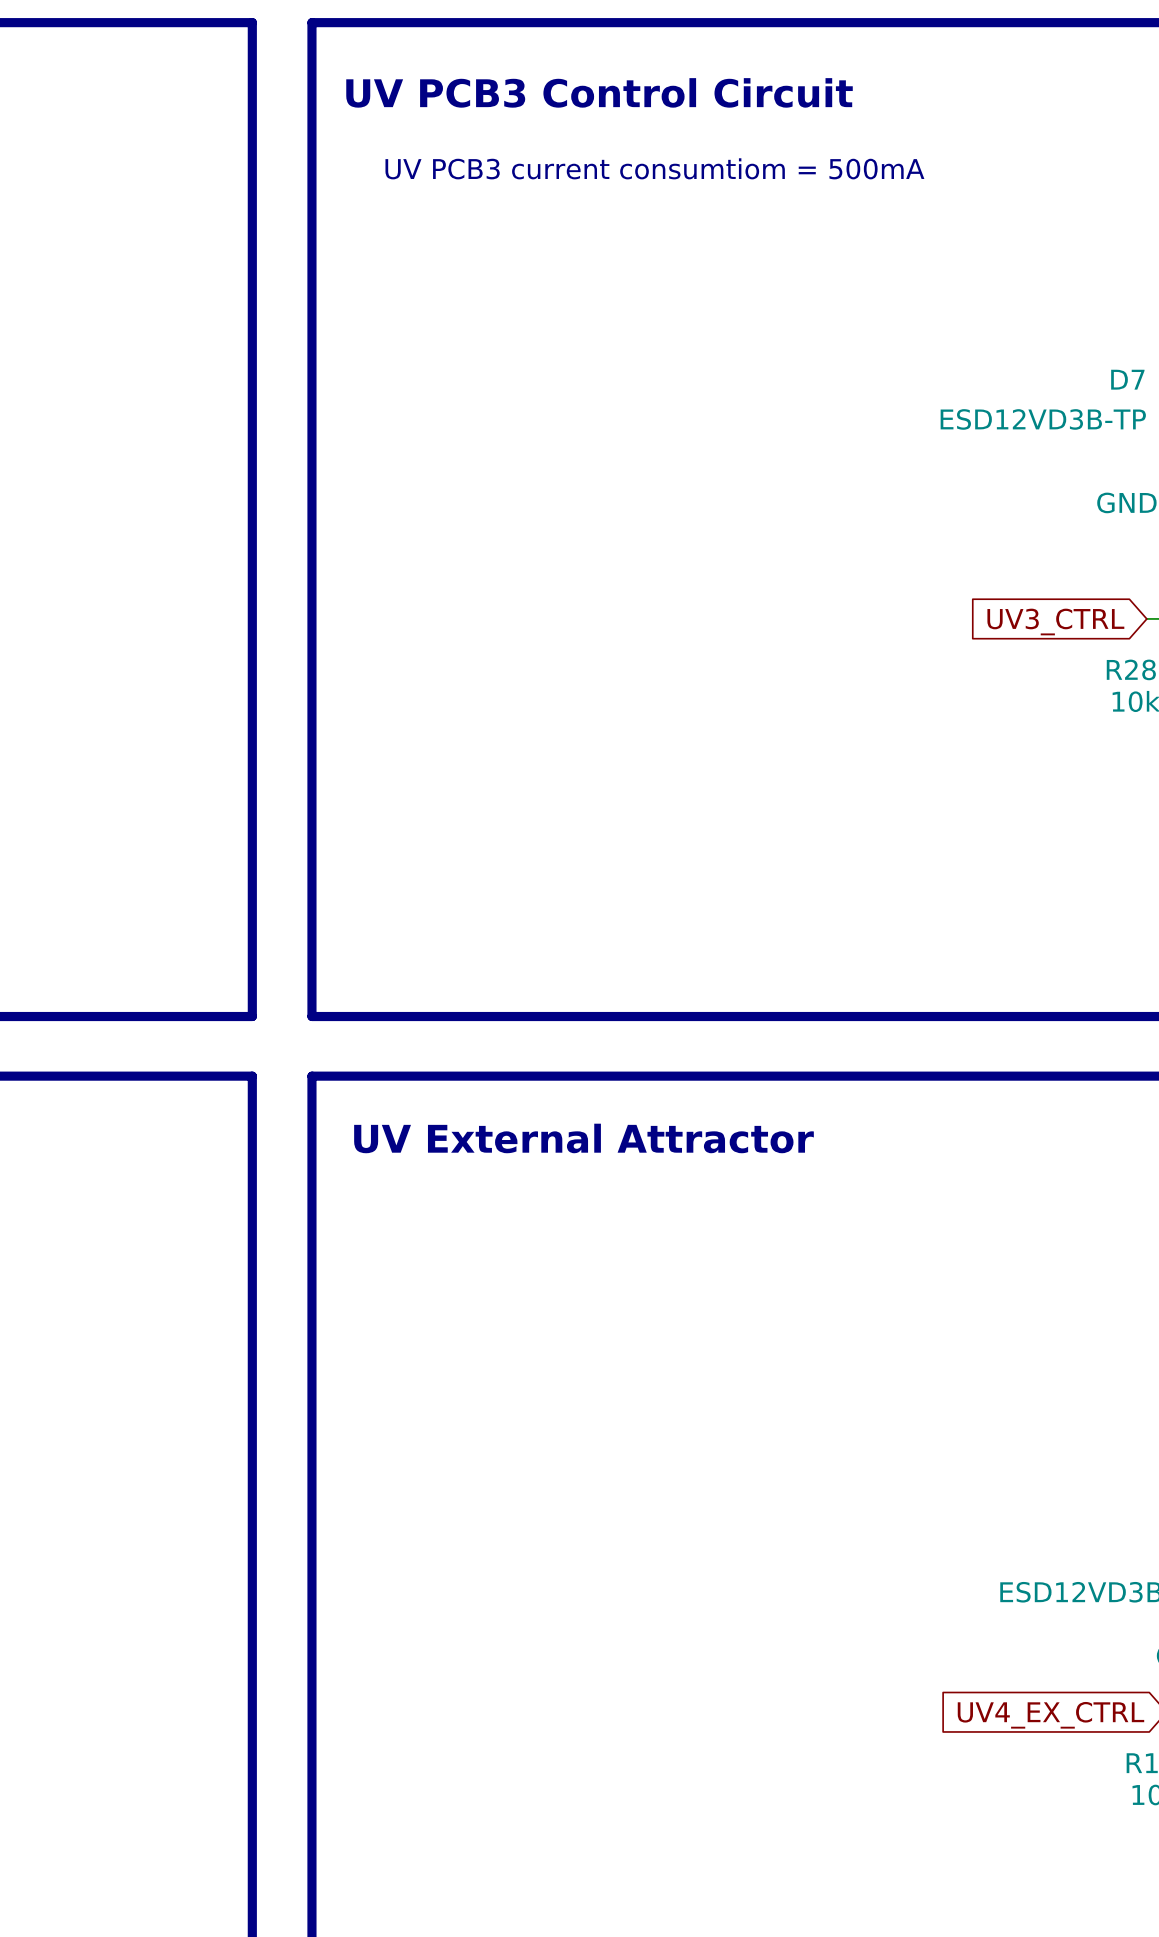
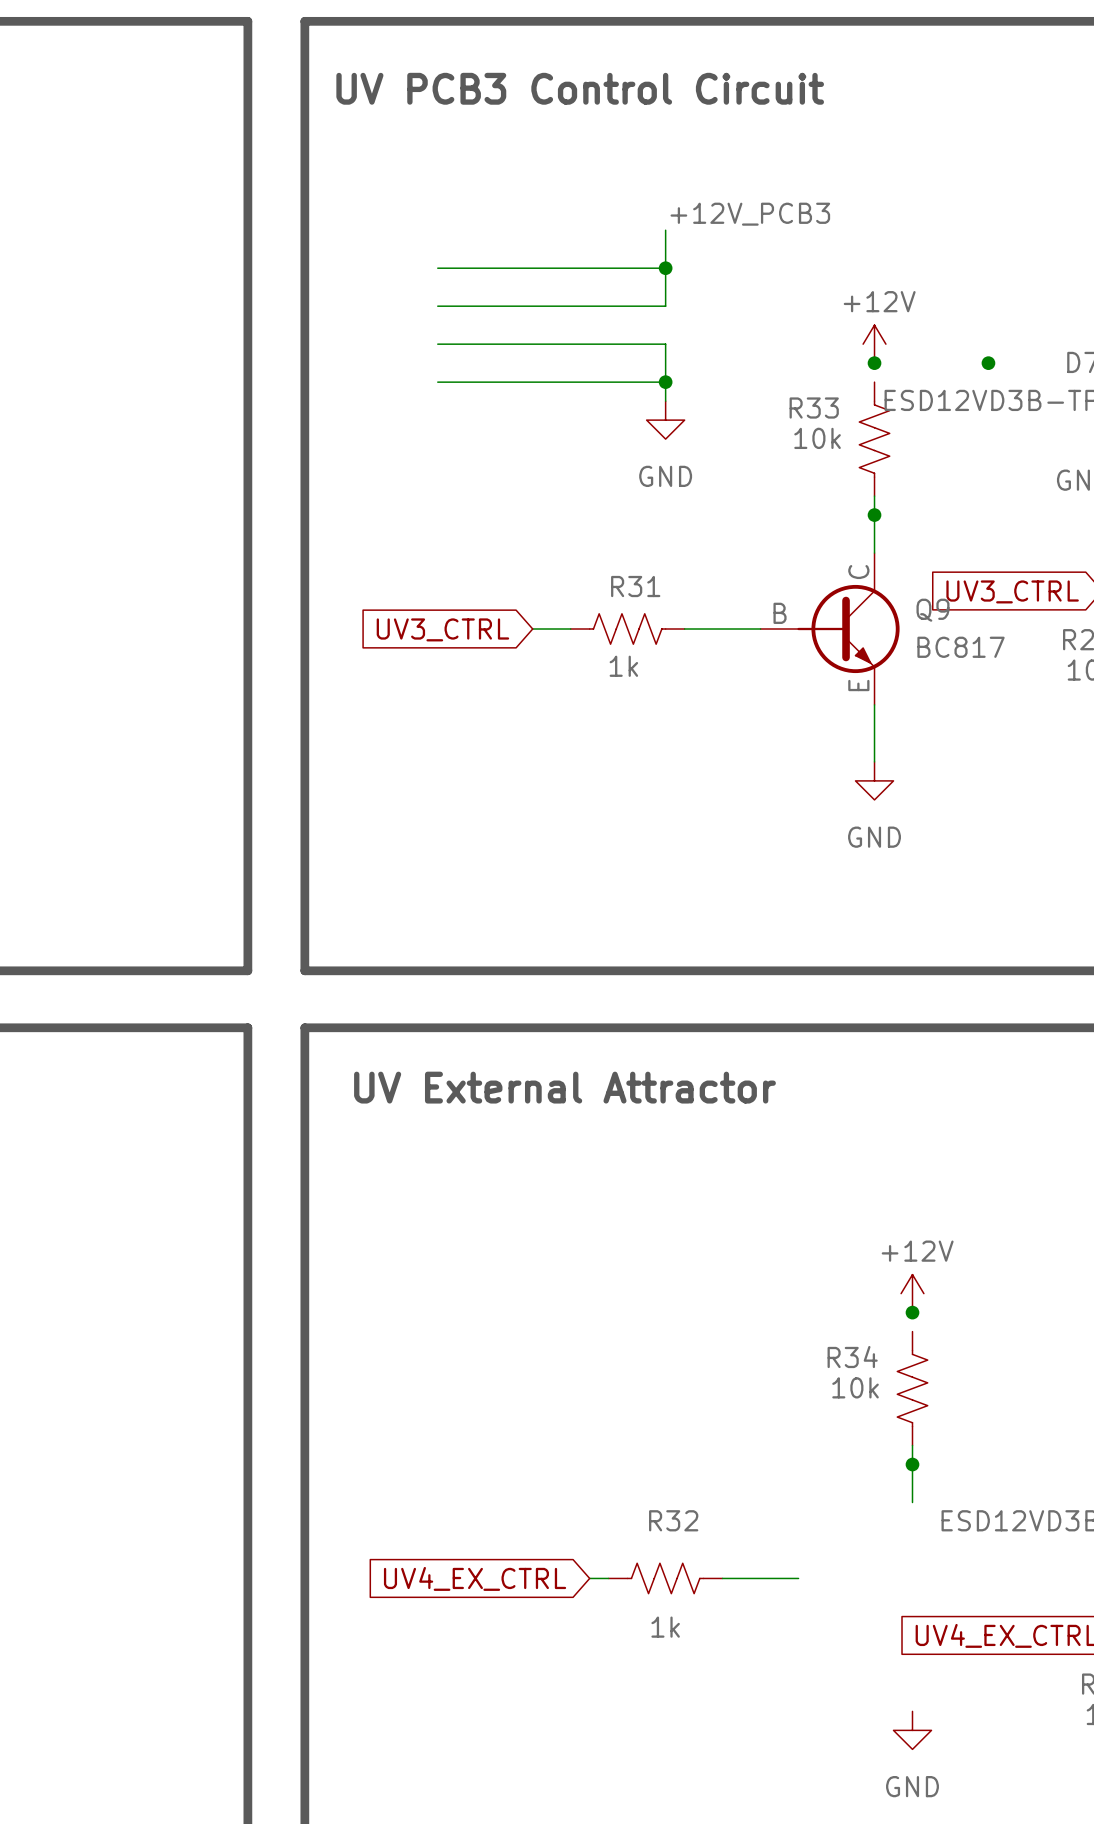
text: UV PCB3 current consumtiom = 500mA (654, 168) -> none
label: none -> +12V_PCB3 (750, 214)
wire: none -> (665, 230) (665, 306) (437, 306)
wire: none -> (437, 268) (665, 268)
junction: none -> (665, 268)
wire: none -> (437, 344) (665, 344) (665, 401)
power symbol: none -> +12V (874, 344)
junction: none -> (874, 363)
junction: none -> (988, 363)
wire: none -> (437, 382) (665, 382)
junction: none -> (665, 382)
power symbol: none -> GND (665, 420)
R33: none -> 10k (874, 439)
wire: none -> (874, 496) (874, 553)
junction: none -> (874, 515)
wire: none -> (532, 629) (570, 629)
R31: none -> 1k (627, 629)
wire: none -> (684, 629) (760, 629)
Q9: none -> BC817 (830, 629)
global label: none -> UV3_CTRL (442, 629)
wire: none -> (874, 704) (874, 761)
power symbol: none -> GND (874, 780)
power symbol: none -> +12V (912, 1293)
junction: none -> (912, 1312)
R34: none -> 10k (912, 1388)
wire: none -> (912, 1445) (912, 1502)
junction: none -> (912, 1464)
wire: none -> (589, 1578) (608, 1578)
R32: none -> 1k (665, 1578)
wire: none -> (722, 1578) (798, 1578)
global label: none -> UV4_EX_CTRL (475, 1578)
power symbol: none -> GND (912, 1730)

